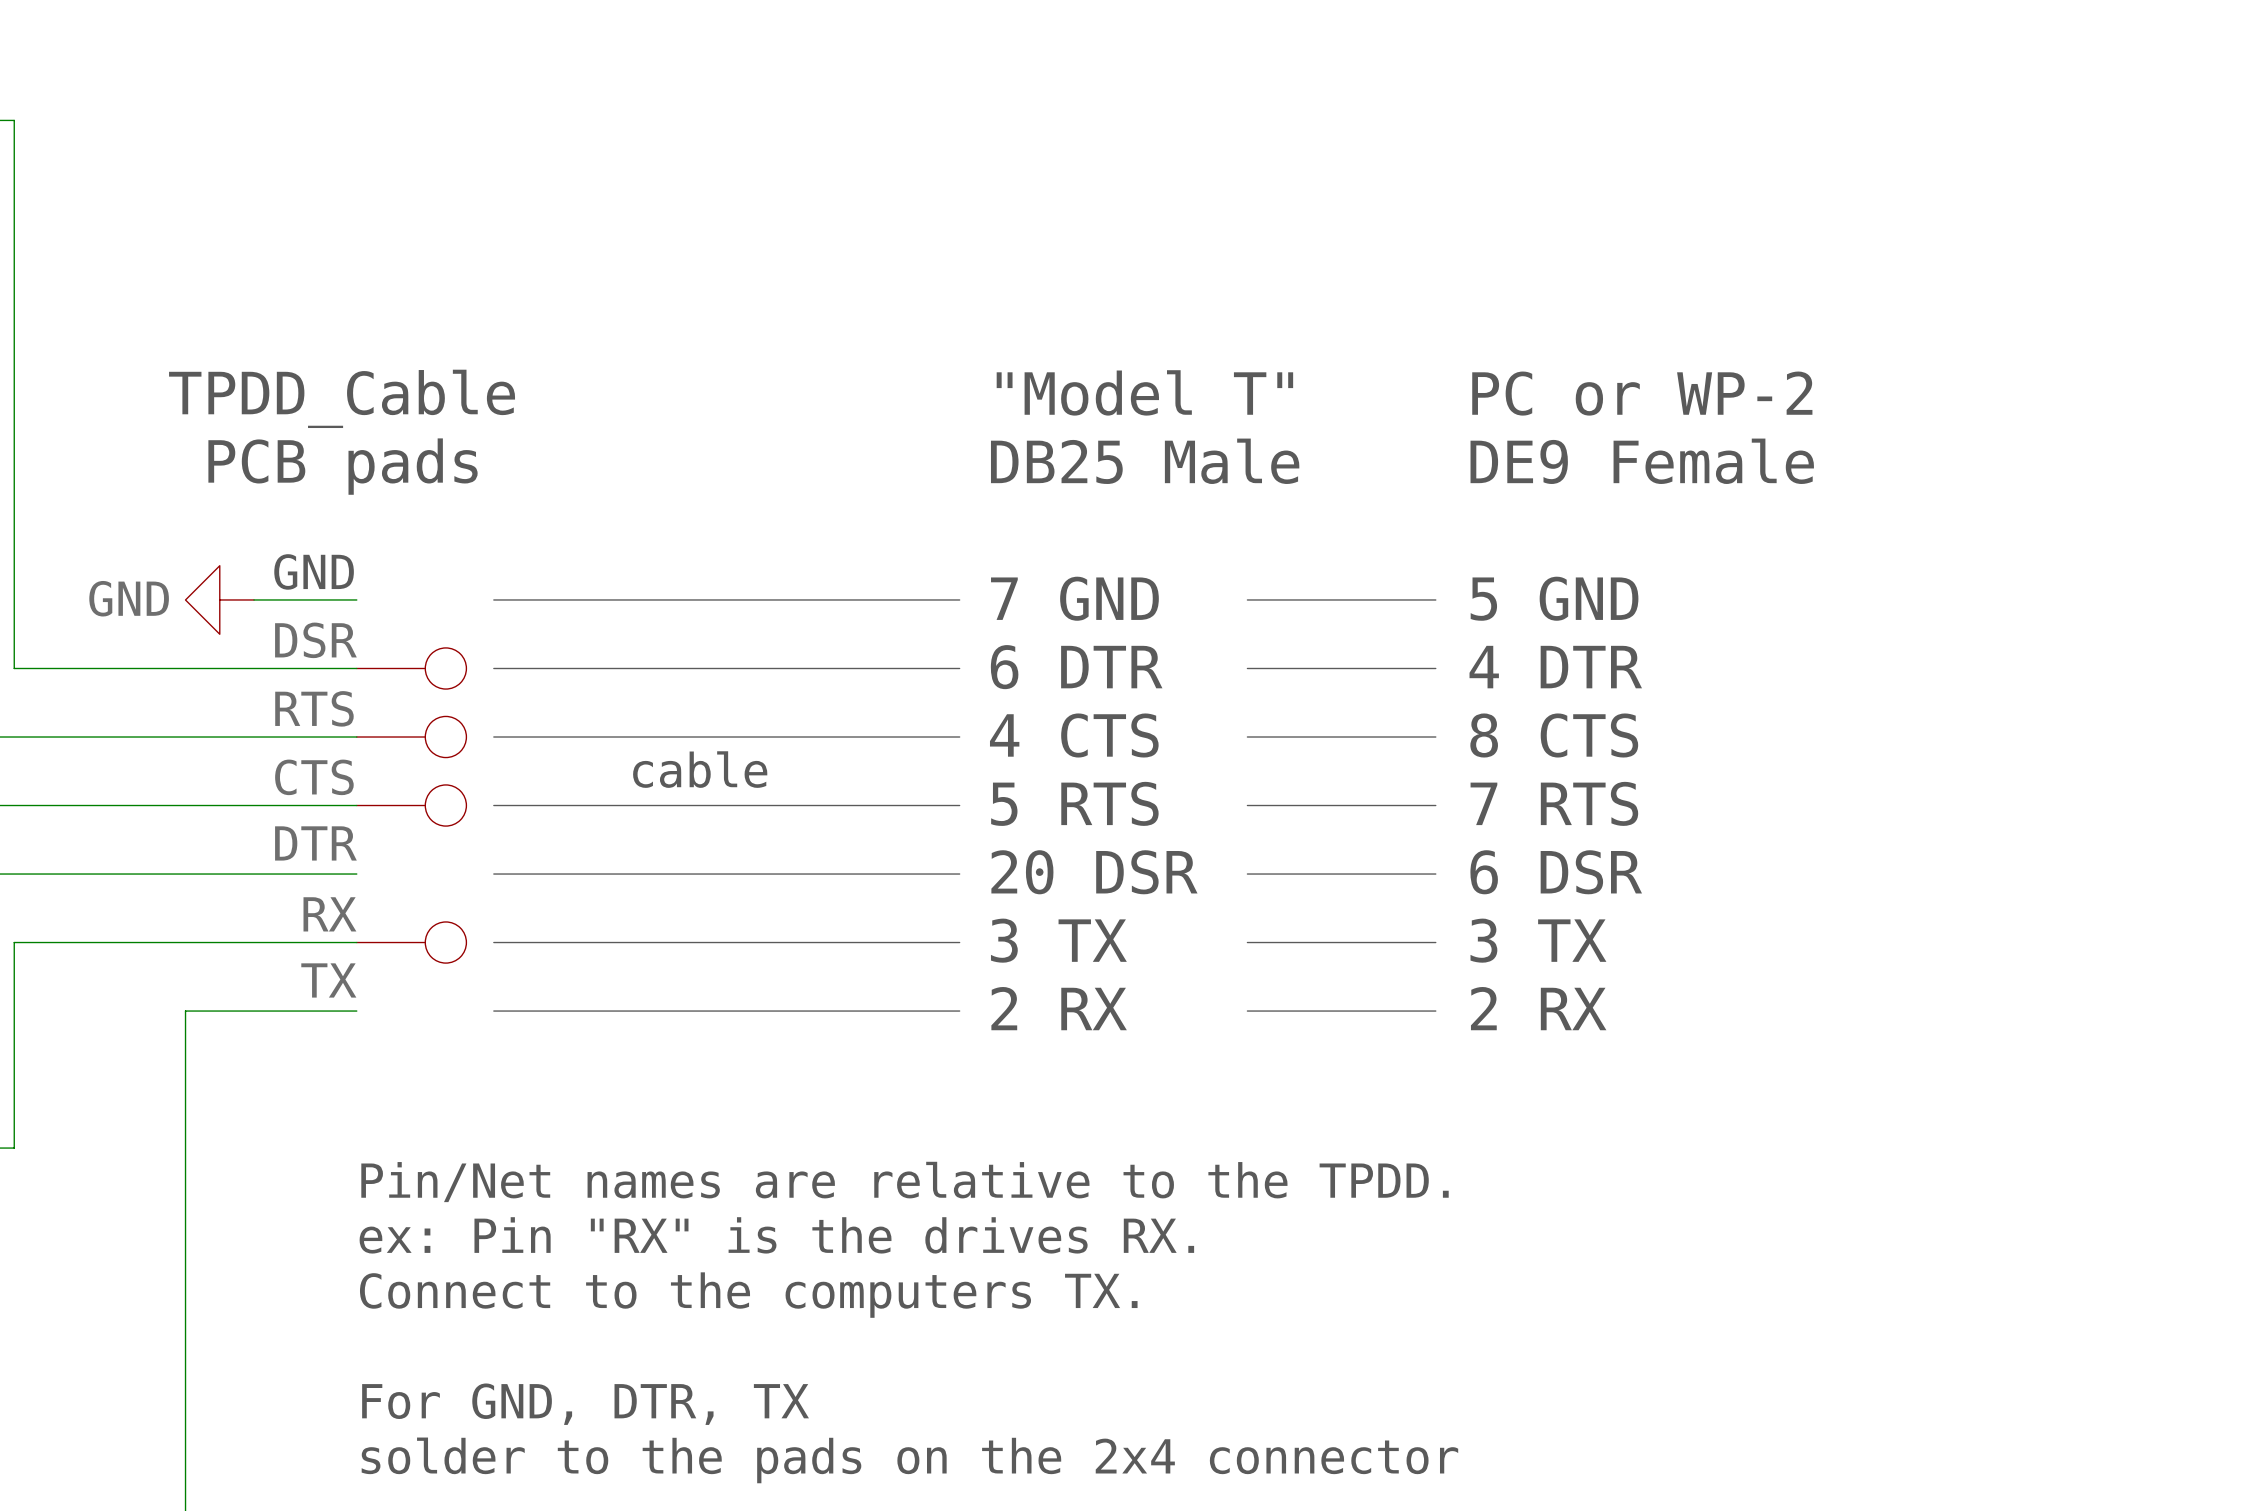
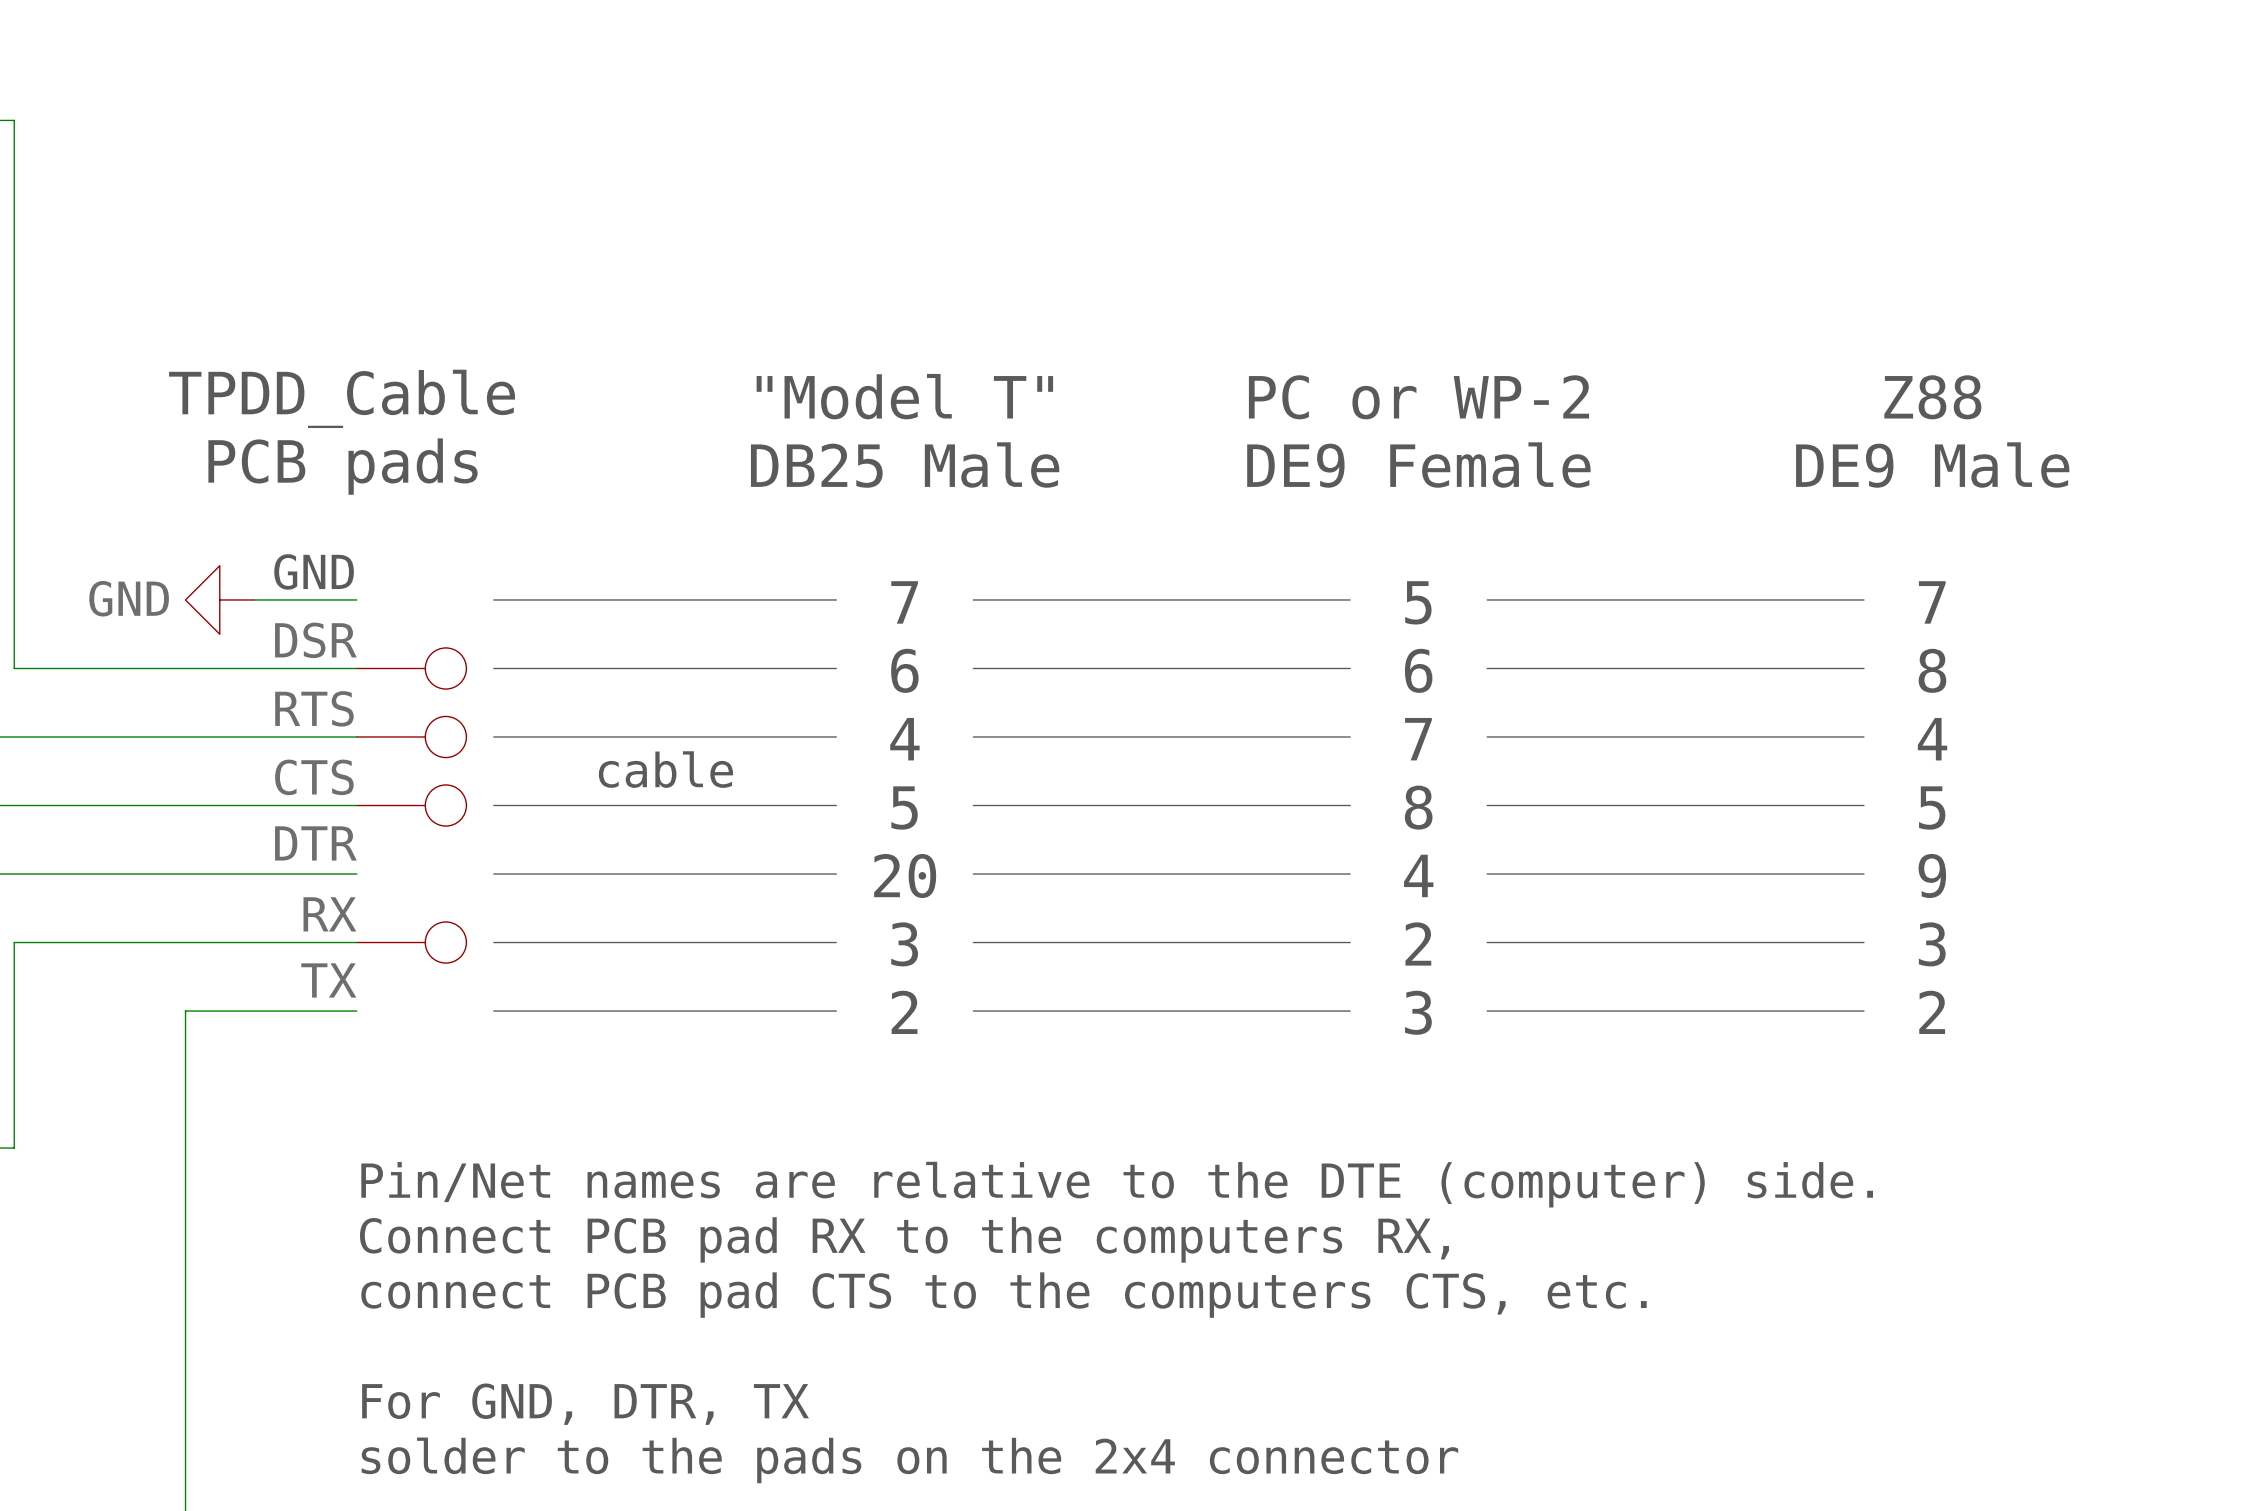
text position: "Model T" (1144, 392) -> "Model T" (904, 396)
text position: PC or WP-2 (1642, 393) -> PC or WP-2 (1419, 397)
text: none -> Z88 (1932, 397)
text position: DB25 Male (1145, 461) -> DB25 Male (905, 465)
text position: DE9 Female (1642, 461) -> DE9 Female (1418, 465)
text: none -> DE9 Male (1932, 465)
text: 7 GND (1074, 598) -> none
text: 5 GND (1554, 598) -> none
line: (836, 599) (959, 599) -> none
line: none -> (973, 599) (1247, 599)
line: (1350, 599) (1435, 599) -> none
line: none -> (1487, 599) (1863, 599)
text: none -> 7 (904, 602)
text: none -> 5 (1418, 602)
text: none -> 7 (1932, 602)
text: 6 DTR (1076, 667) -> none
text: 4 DTR (1555, 667) -> none
line: (836, 668) (959, 668) -> none
line: none -> (973, 668) (1247, 668)
line: (1350, 668) (1435, 668) -> none
line: none -> (1487, 668) (1863, 668)
text: none -> 6 (904, 670)
text: none -> 6 (1418, 670)
text: none -> 8 (1932, 670)
text: 4 CTS (1074, 735) -> none
text: 8 CTS (1554, 735) -> none
line: (836, 737) (959, 737) -> none
line: none -> (973, 737) (1247, 737)
line: (1350, 737) (1435, 737) -> none
line: none -> (1487, 737) (1863, 737)
text: none -> 4 (904, 739)
text: none -> 7 (1418, 739)
text: none -> 4 (1932, 739)
text position: cable (700, 769) -> cable (665, 769)
text: 5 RTS (1074, 803) -> none
text: 7 RTS (1554, 803) -> none
line: (836, 805) (959, 805) -> none
line: none -> (973, 805) (1247, 805)
line: (1350, 805) (1435, 805) -> none
line: none -> (1487, 805) (1863, 805)
text: none -> 8 (1418, 807)
text: none -> 5 (904, 808)
text: none -> 5 (1932, 808)
text: 20 DSR (1094, 872) -> none
text: 6 DSR (1556, 872) -> none
line: (836, 874) (959, 874) -> none
line: none -> (973, 874) (1247, 874)
line: (1350, 874) (1435, 874) -> none
line: none -> (1487, 874) (1863, 874)
text: none -> 4 (1418, 875)
text: none -> 20 (905, 876)
text: none -> 9 (1932, 876)
text: 3 TX (1058, 940) -> none
text: 3 TX (1538, 940) -> none
line: (836, 942) (959, 942) -> none
line: none -> (973, 942) (1247, 942)
line: (1350, 942) (1435, 942) -> none
line: none -> (1487, 942) (1863, 942)
text: none -> 2 (1418, 943)
text: none -> 3 (904, 944)
text: none -> 3 (1932, 944)
text: 2 RX (1059, 1008) -> none
text: 2 RX (1538, 1008) -> none
line: (836, 1011) (959, 1011) -> none
line: none -> (973, 1011) (1247, 1011)
line: (1350, 1011) (1435, 1011) -> none
line: none -> (1487, 1011) (1863, 1011)
text: none -> 2 (904, 1012)
text: none -> 3 (1418, 1012)
text: none -> 2 (1932, 1012)
text: Pin/Net names are relative to the TPDD. (905, 1181) -> Pin/Net names are relative to the DTE (computer) side. (1117, 1184)
text: ex: Pin "RX" is the drives RX. (776, 1235) -> Connect PCB pad RX to the computers RX, (904, 1239)
text: Connect to the computers TX. (748, 1295) -> connect PCB pad CTS to the computers CTS, etc. (1003, 1295)

